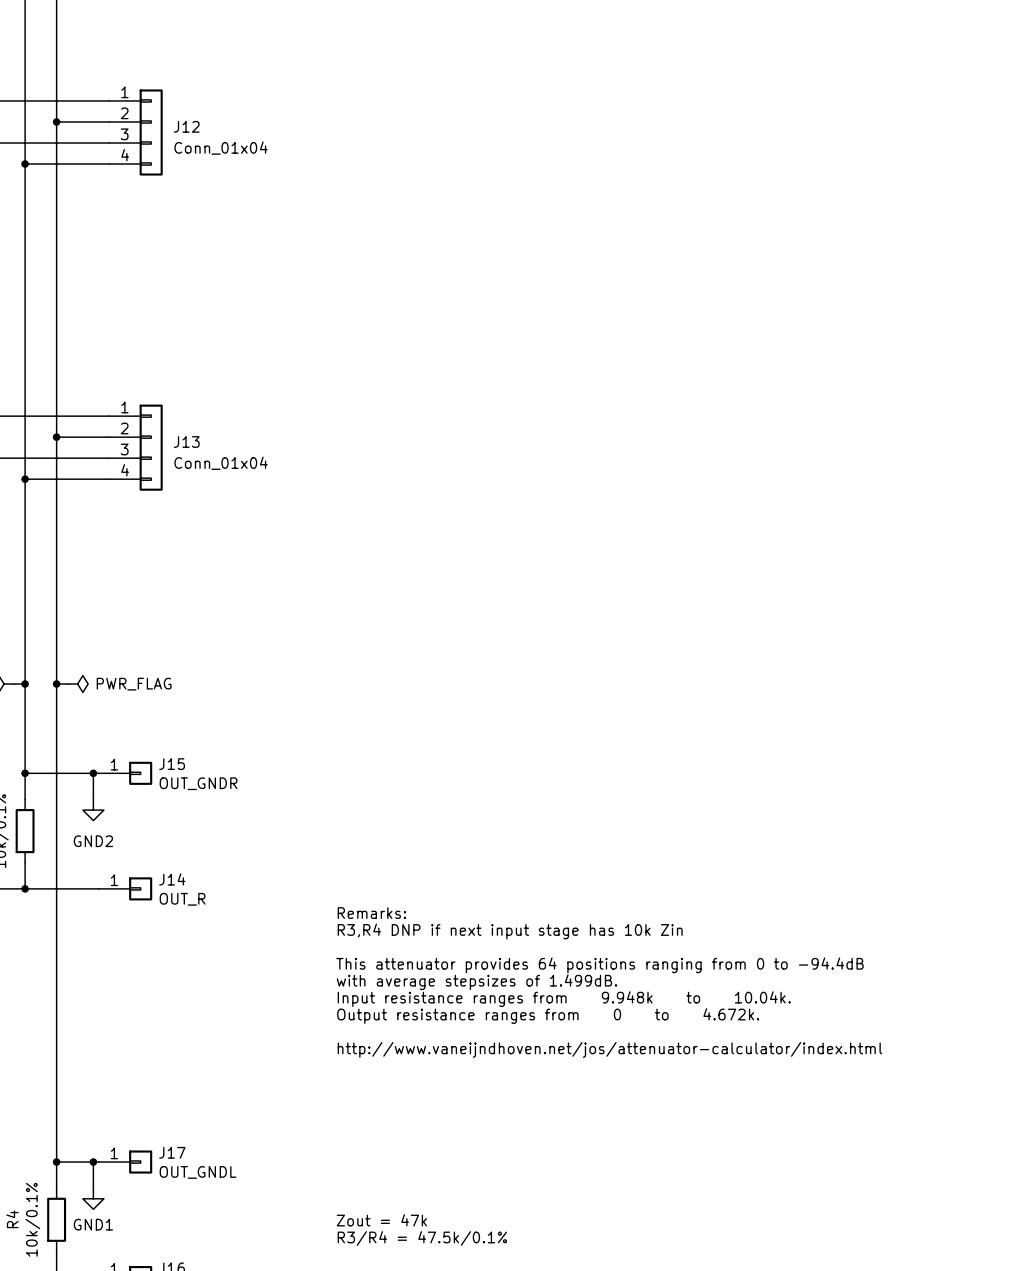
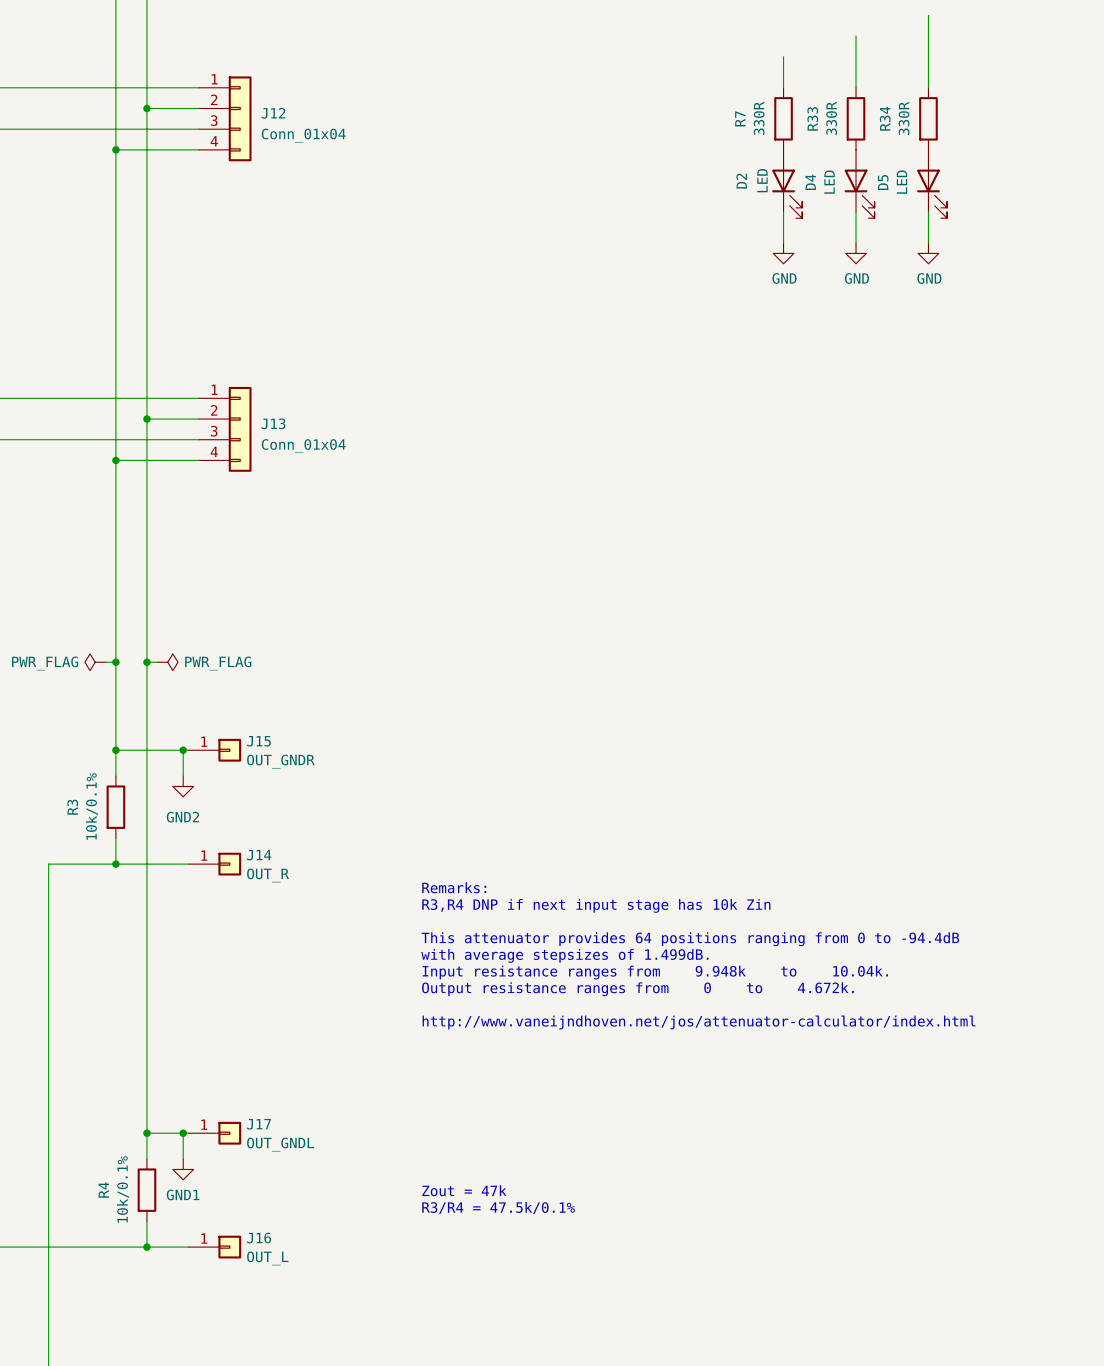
wire: none -> (928, 15) (928, 87)
wire: none -> (856, 36) (856, 87)
wire: none -> (783, 56) (783, 87)
R7: none -> 330R (783, 118)
R33: none -> 330R (856, 118)
R34: none -> 330R (928, 118)
D2: none -> LED (787, 184)
D4: none -> LED (859, 184)
D5: none -> LED (932, 184)
wire: none -> (783, 212) (783, 243)
wire: none -> (856, 212) (856, 243)
wire: none -> (928, 212) (928, 243)
power symbol: none -> GND (783, 253)
power symbol: none -> GND (856, 253)
power symbol: none -> GND (928, 253)

